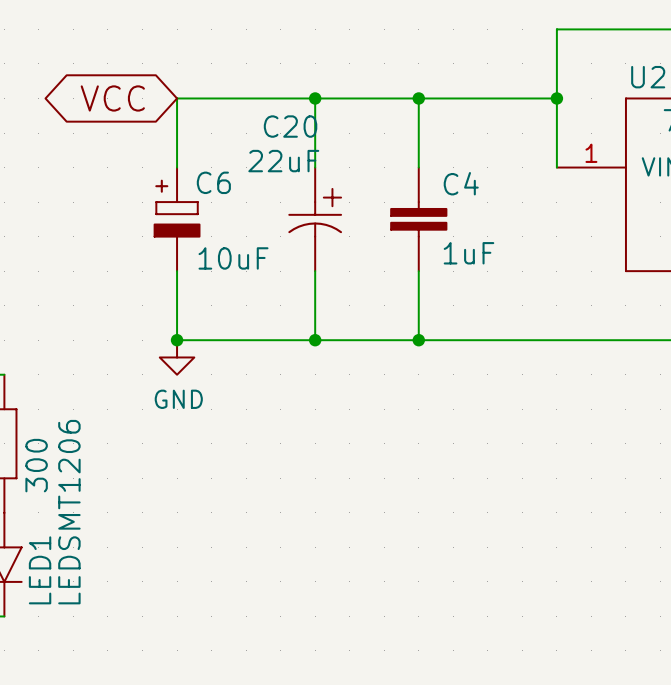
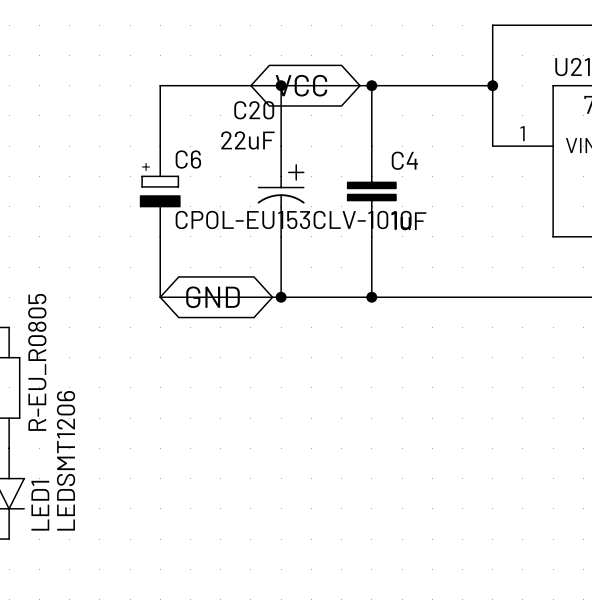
global label rotation: 0° (112, 98) -> 180° (301, 85)
global label position: VCC (112, 98) -> VCC (301, 85)
C6 value: 10uF (233, 258) -> CPOL-EU153CLV-1010 (293, 219)
junction: (177, 340) -> none
global label: none -> GND (213, 297)
power symbol: GND (177, 357) -> none
part value: 300 (36, 465) -> R-EU_R0805 (37, 362)

